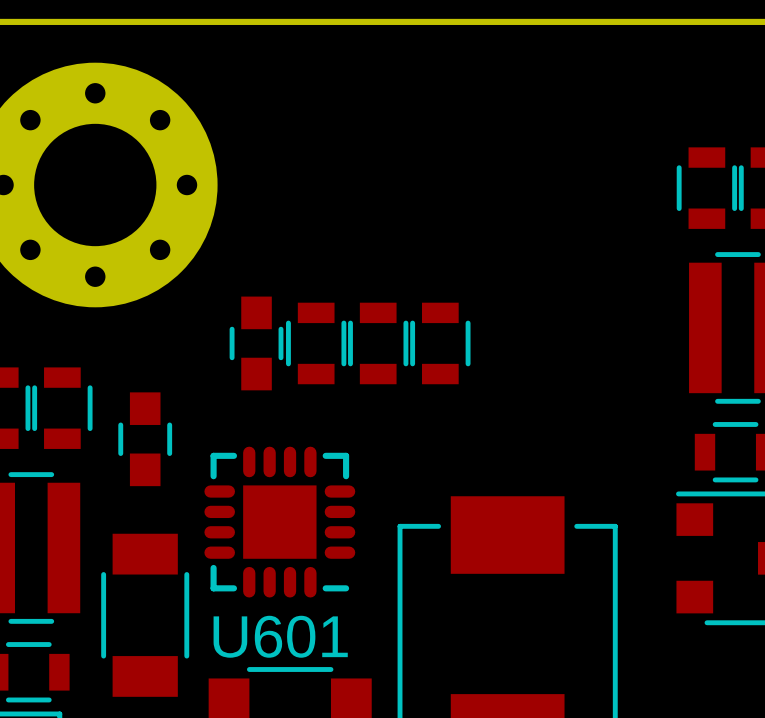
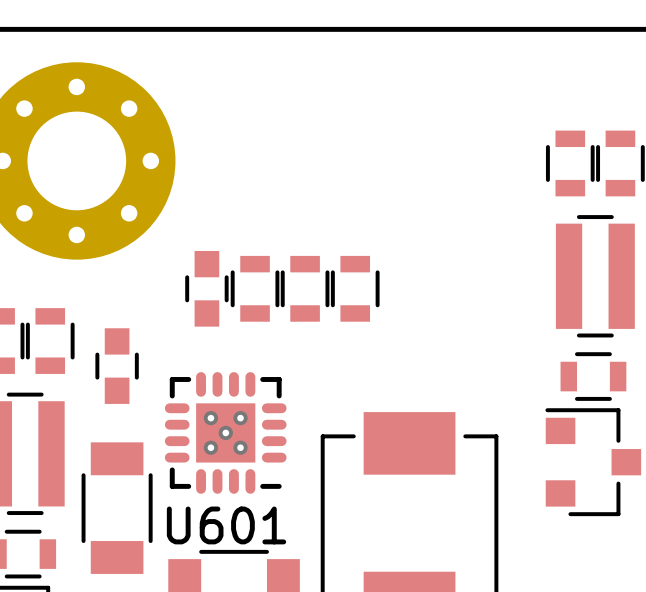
via: none -> (210, 418)
via: none -> (240, 418)
via: none -> (225, 432)
via: none -> (210, 447)
via: none -> (240, 447)

